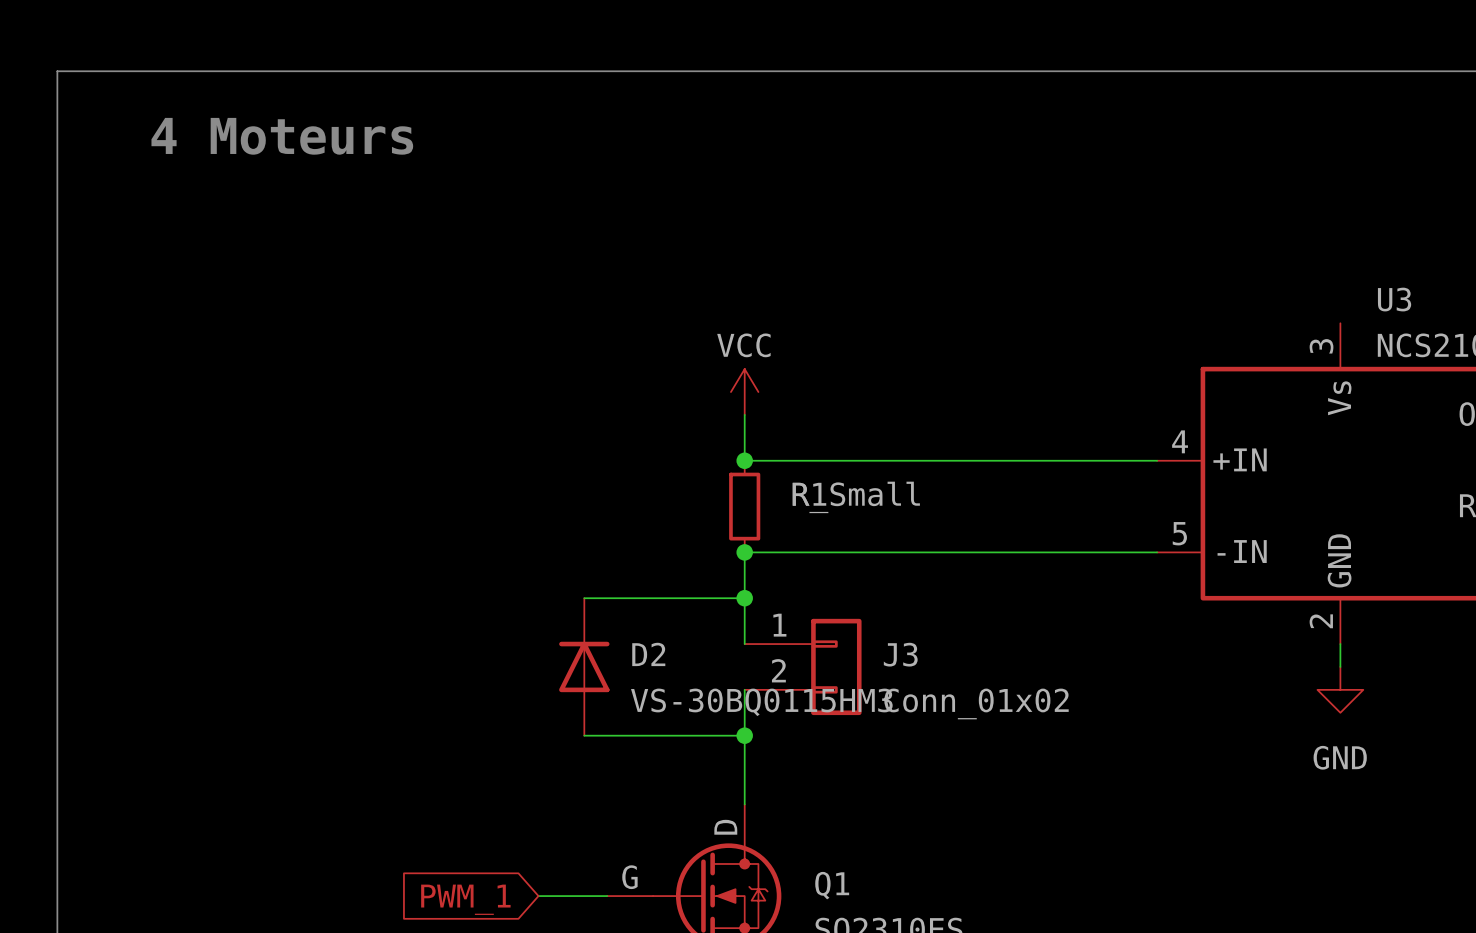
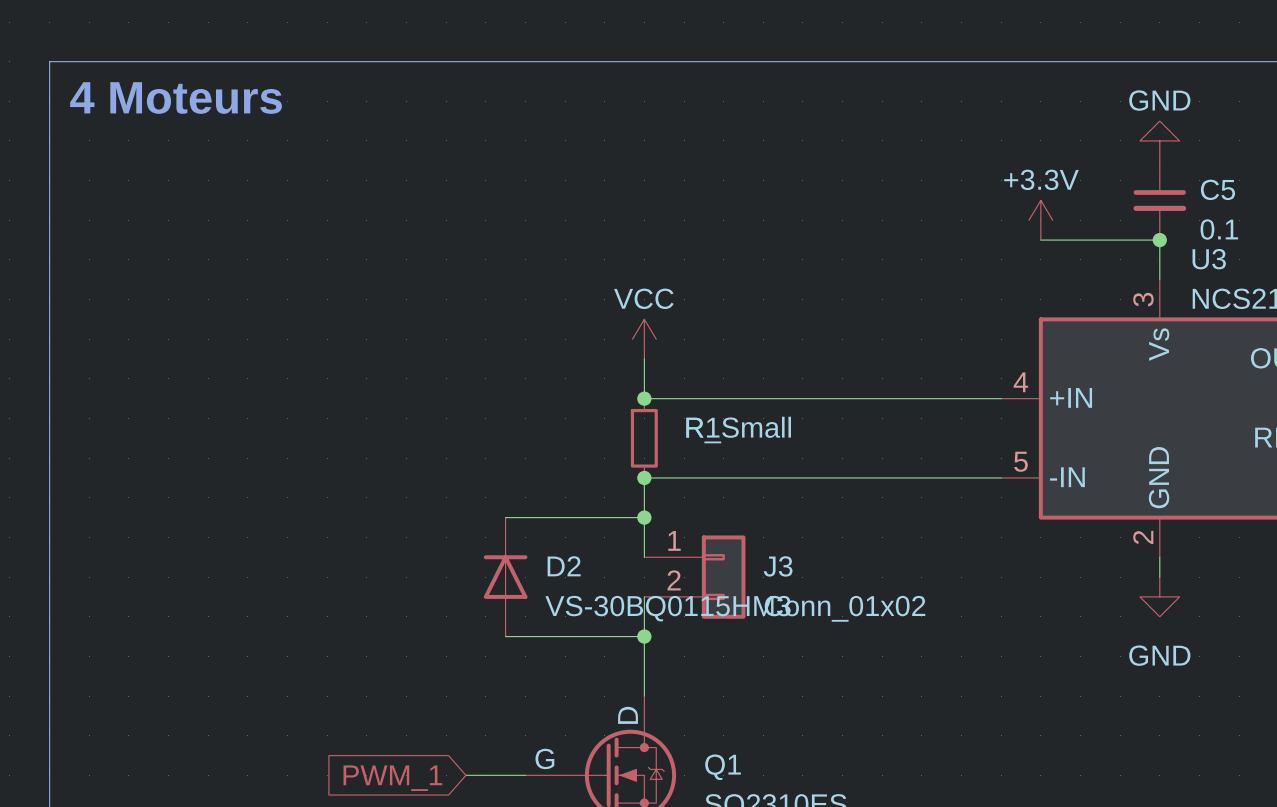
text position: 4 Moteurs (282, 136) -> 4 Moteurs (176, 98)
power symbol: none -> GND (1159, 140)
C5: none -> 0.1 (1159, 200)
power symbol: none -> +3.3V (1040, 220)
wire: none -> (1040, 240) (1159, 240) (1159, 279)
junction: none -> (1159, 240)

